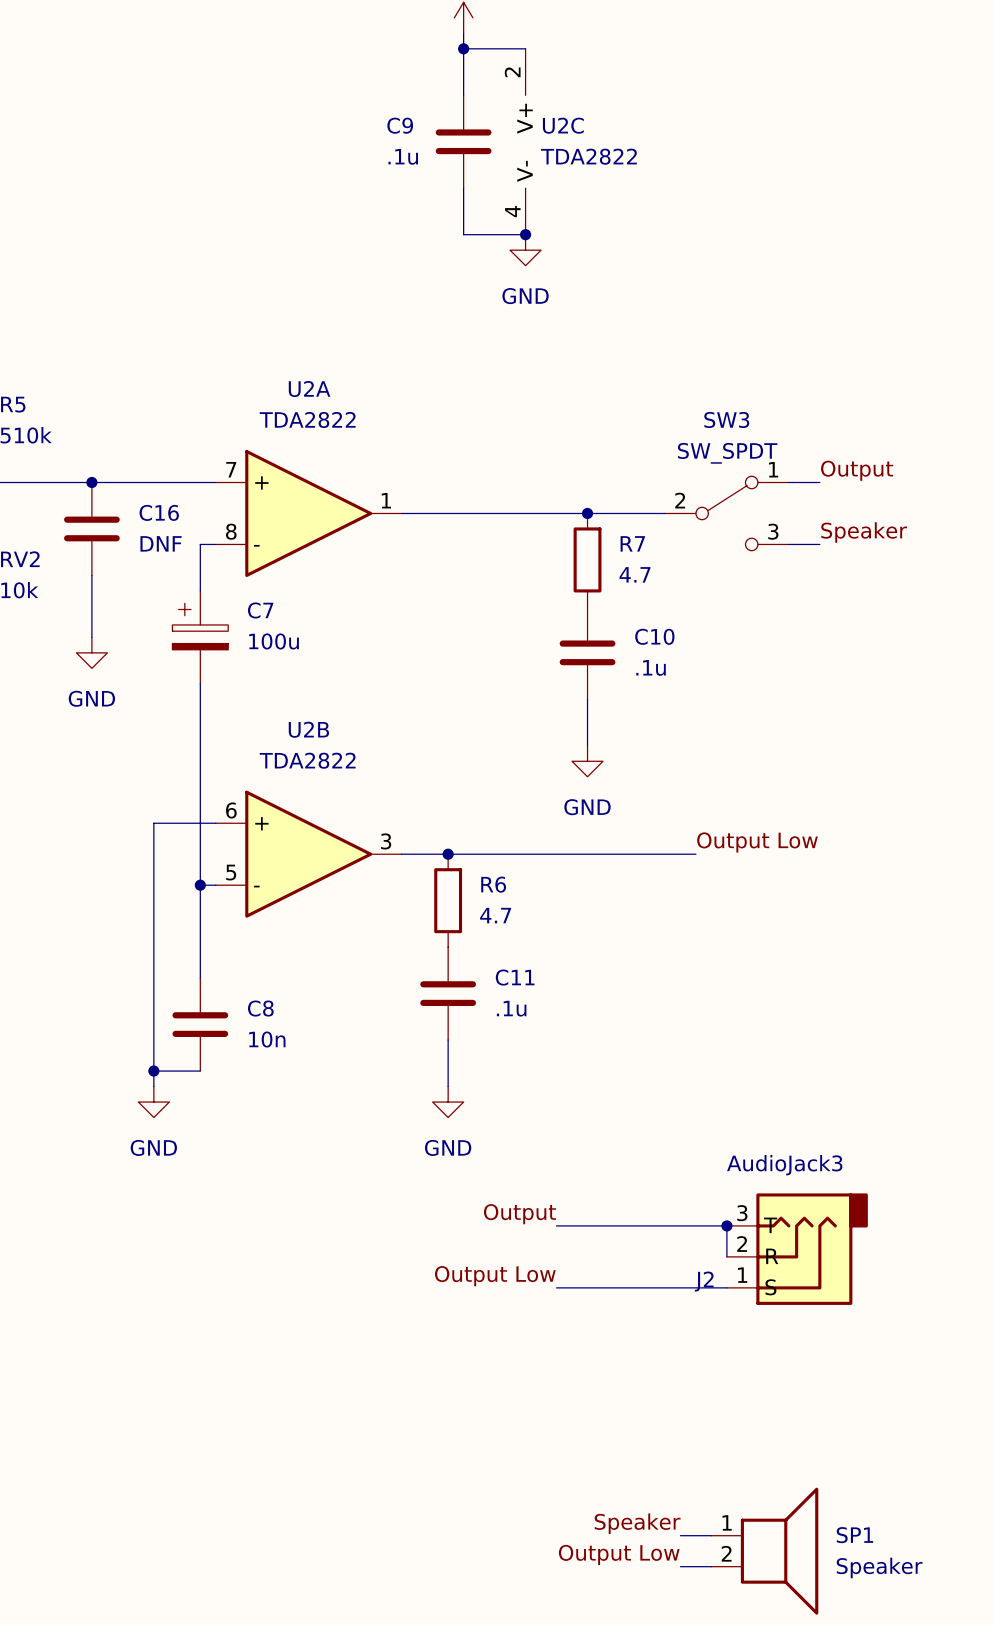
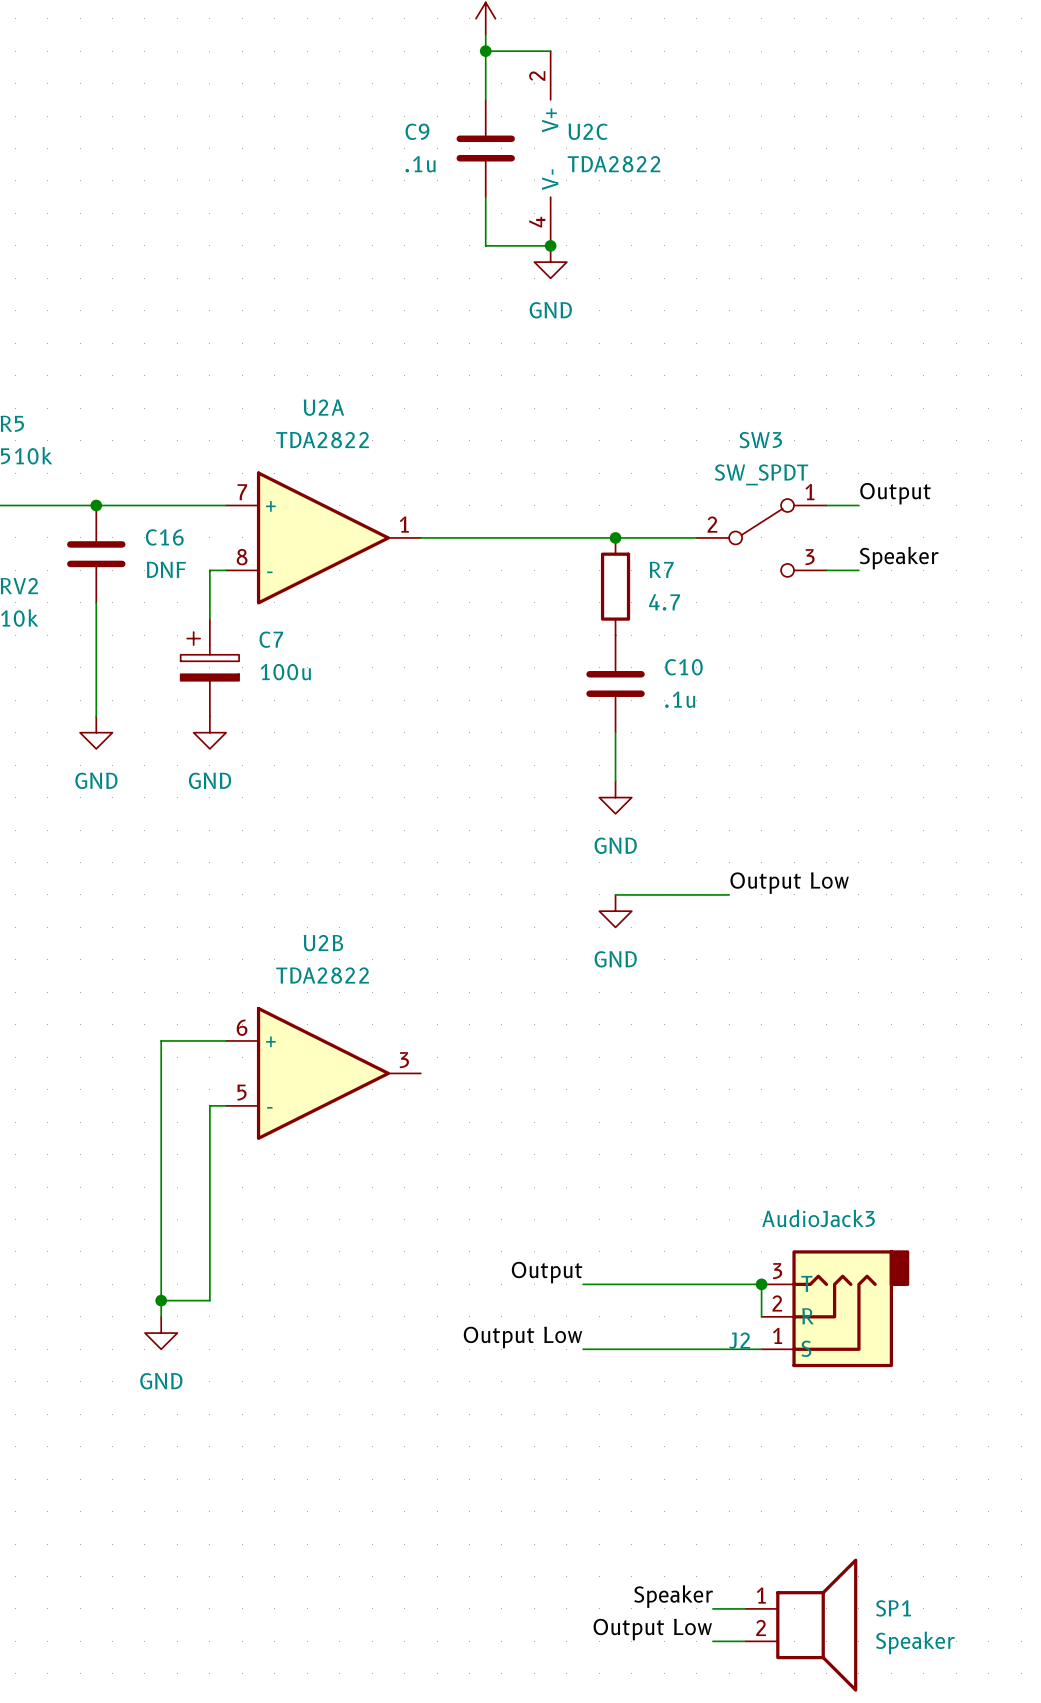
wire: none -> (96, 667) (96, 716)
power symbol position: GND (91, 652) -> GND (96, 732)
wire: (200, 683) (200, 978) -> none
power symbol: none -> GND (209, 732)
wire: (215, 823) (153, 823) (153, 993) -> (226, 1040) (161, 1040)
U2B position: (308, 854) -> (323, 1073)
wire: (401, 854) (587, 854) -> none
junction: (448, 854) -> none
power symbol: none -> GND (615, 911)
wire: (200, 885) (215, 885) -> none
junction: (200, 885) -> none
R6: 4.7 (448, 900) -> none
C11: .1u (448, 993) -> none
C8: 10n (200, 1024) -> none
wire: (448, 1040) (448, 1086) -> none
wire: none -> (226, 1105) (209, 1105) (209, 1300) (161, 1300)
wire: (153, 1071) (200, 1071) -> none
junction: (153, 1071) -> none
wire: none -> (161, 1138) (161, 1316)
power symbol: GND (153, 1102) -> none
power symbol: GND (448, 1102) -> none
junction: none -> (161, 1300)
power symbol: none -> GND (161, 1333)

